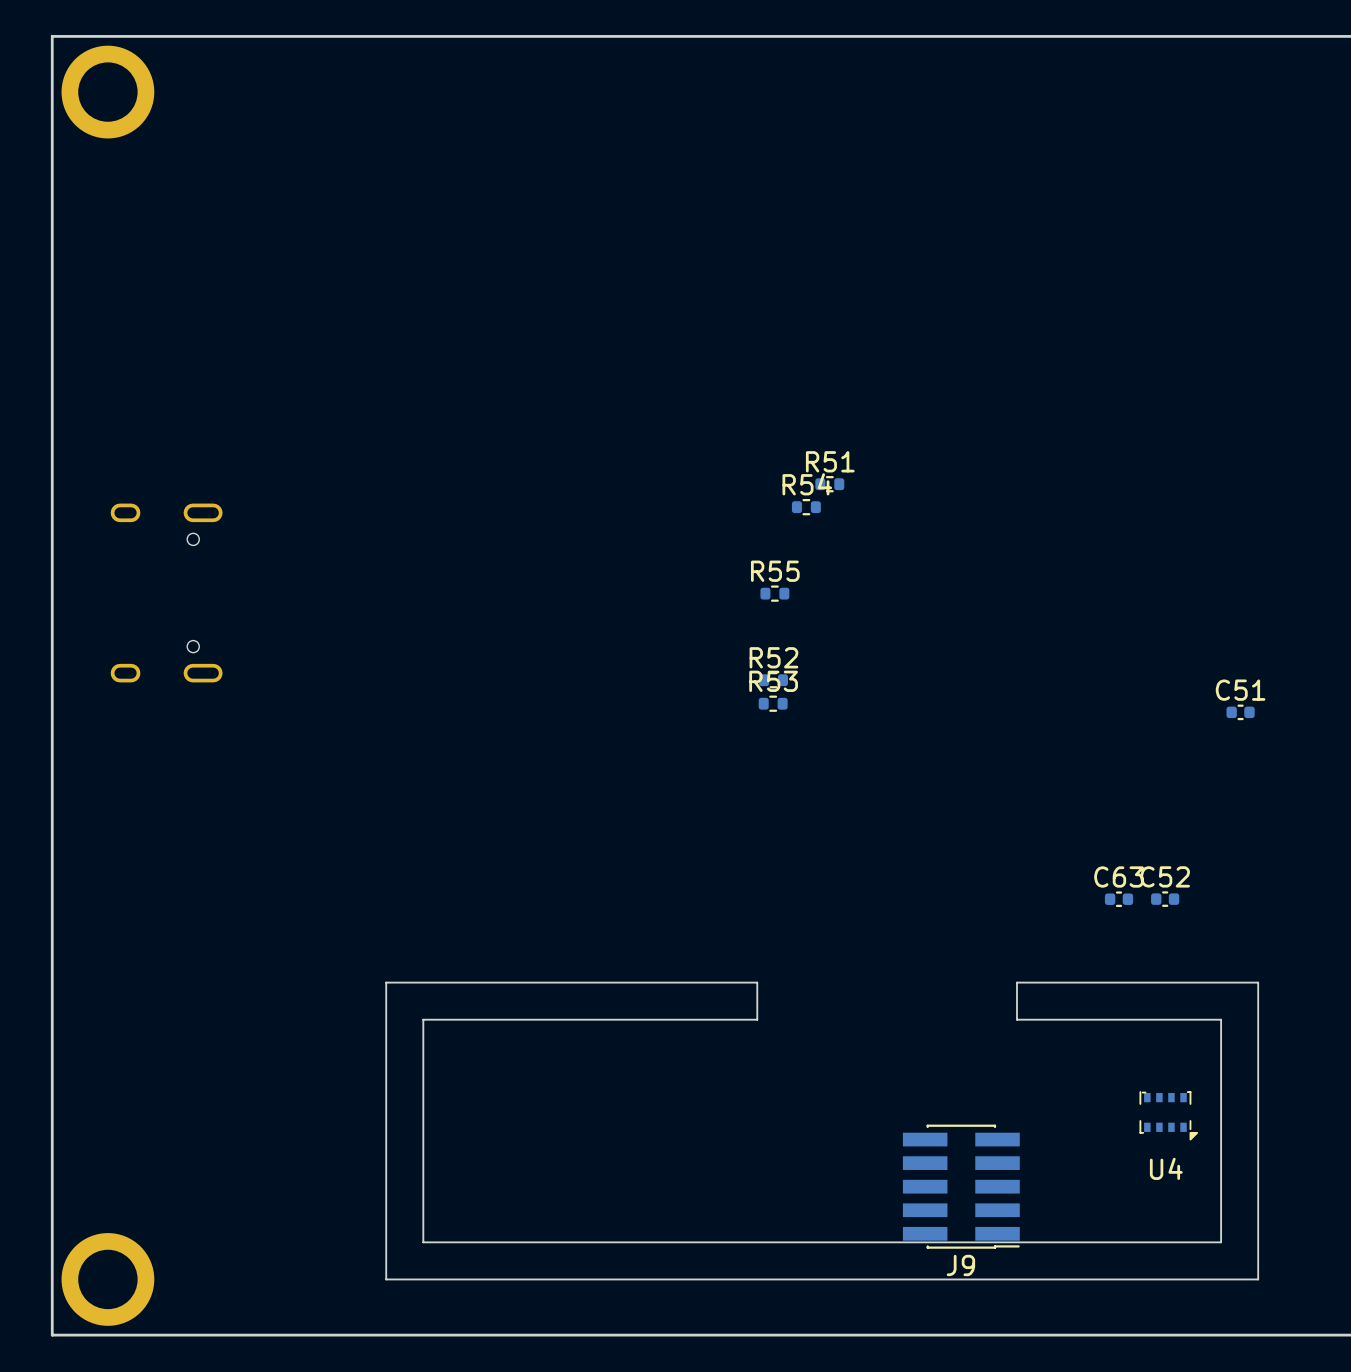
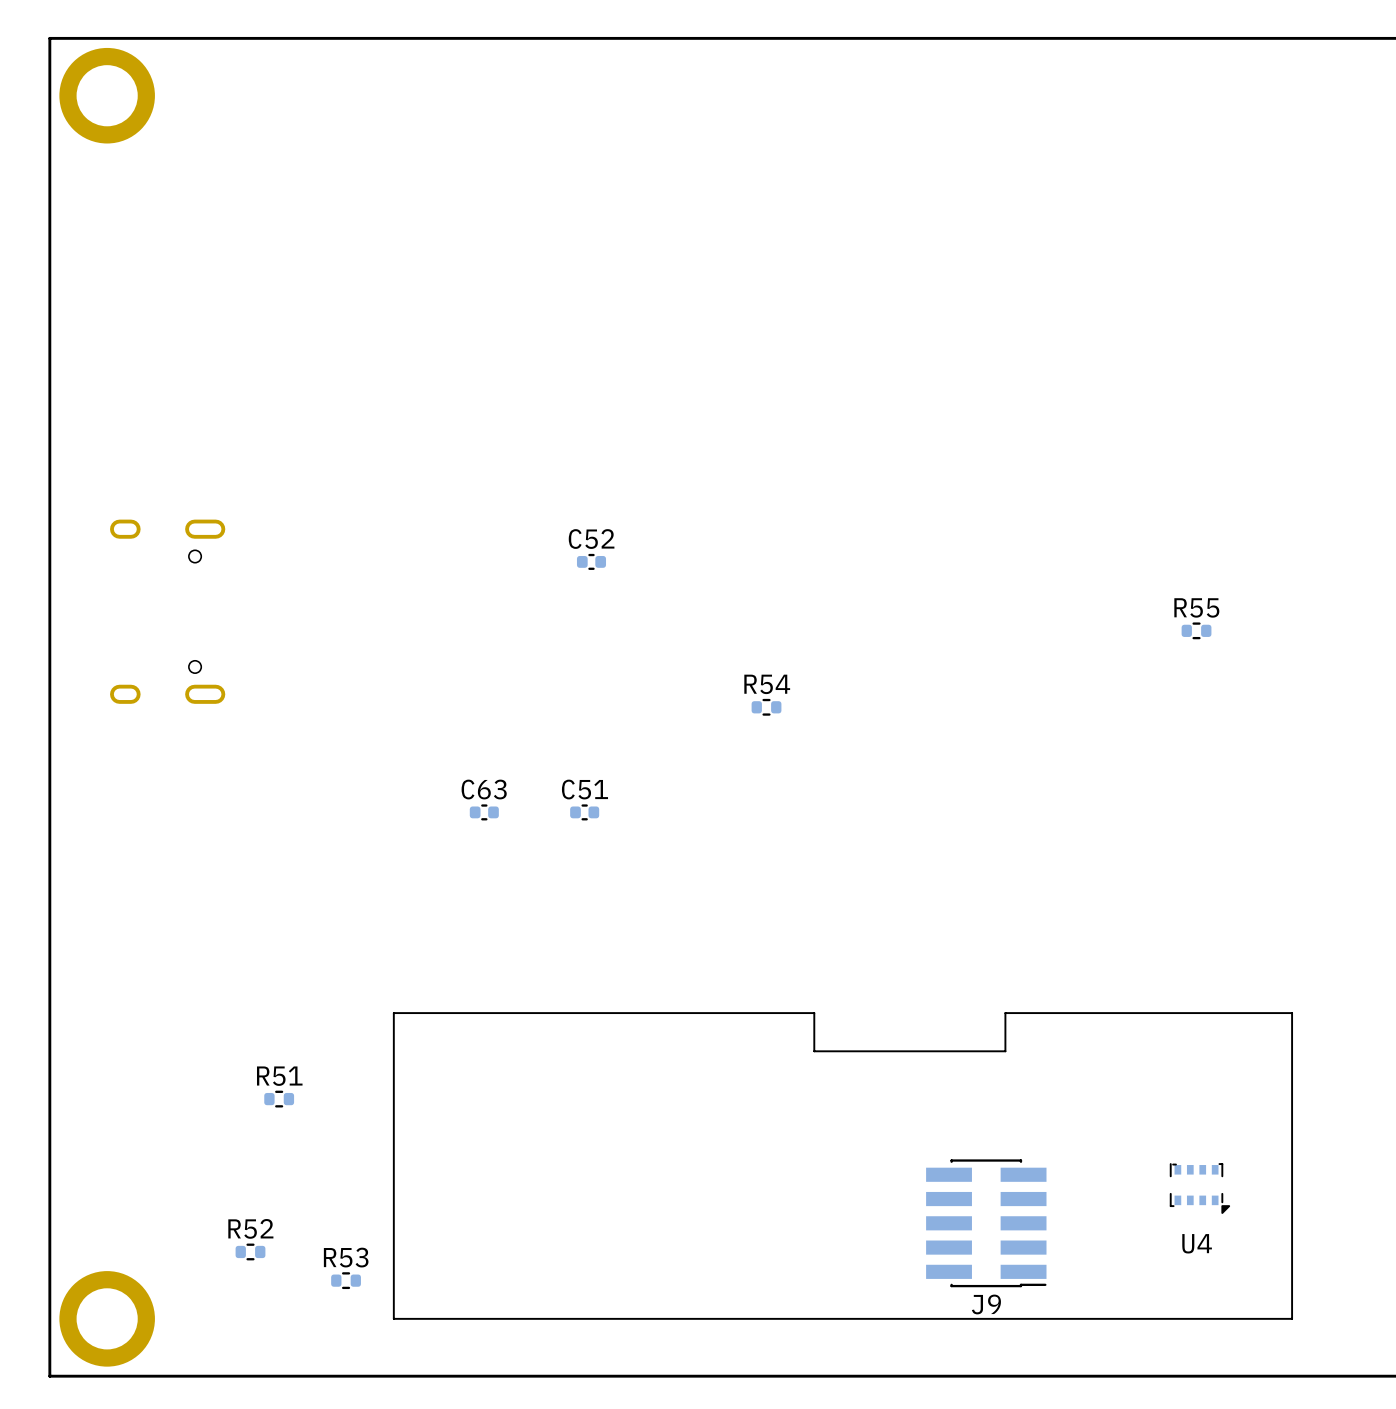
R51 position: (829, 484) -> (279, 1099)
R54 position: (806, 507) -> (766, 707)
R55 position: (774, 593) -> (1196, 630)
R52 position: (773, 680) -> (250, 1251)
R53 position: (773, 703) -> (346, 1280)
C51 position: (1240, 712) -> (584, 812)
C63 position: (1119, 899) -> (484, 812)
C52 position: (1165, 899) -> (591, 561)
board edge: (1017, 982) (1017, 1019) (1221, 1019) (1221, 1242) (423, 1242) (423, 1019) (757, 1019) (757, 982) -> (1043, 1013) (1005, 1013) (1005, 1051) (814, 1051) (814, 1013) (776, 1013)
U4 position: (1168, 1115) -> (1199, 1188)

